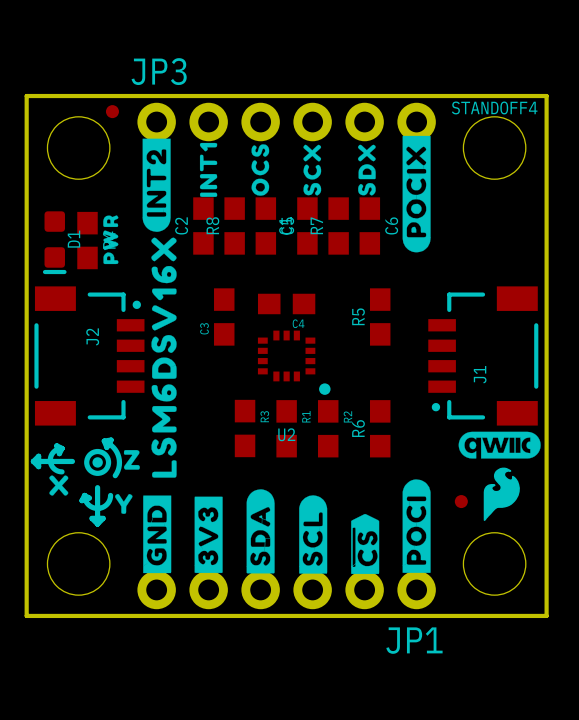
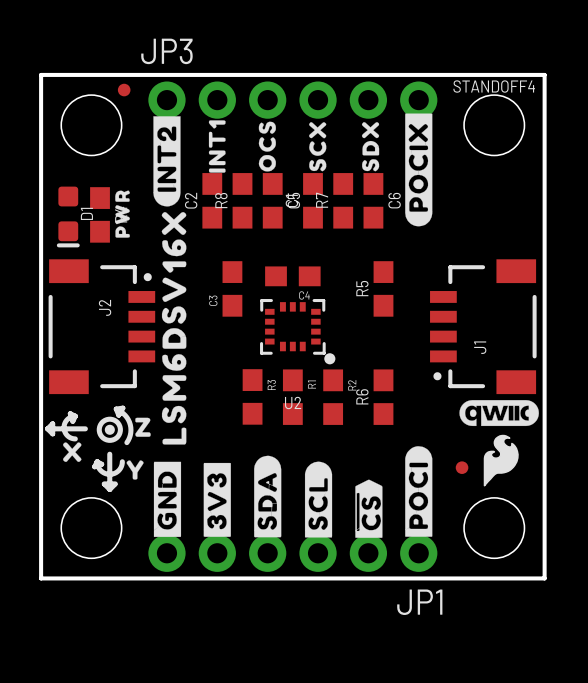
U2 footprint: [257, 330, 331, 395] -> [260, 299, 336, 365]

